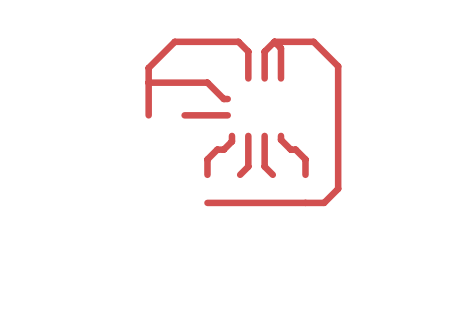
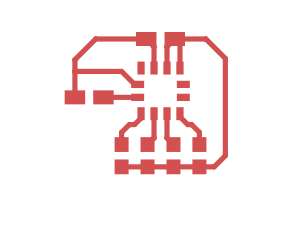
part: none -> (160, 38)
part: none -> (160, 90)
part: none -> (89, 97)
part: none -> (121, 155)
part: none -> (147, 155)
part: none -> (173, 155)
part: none -> (199, 155)

